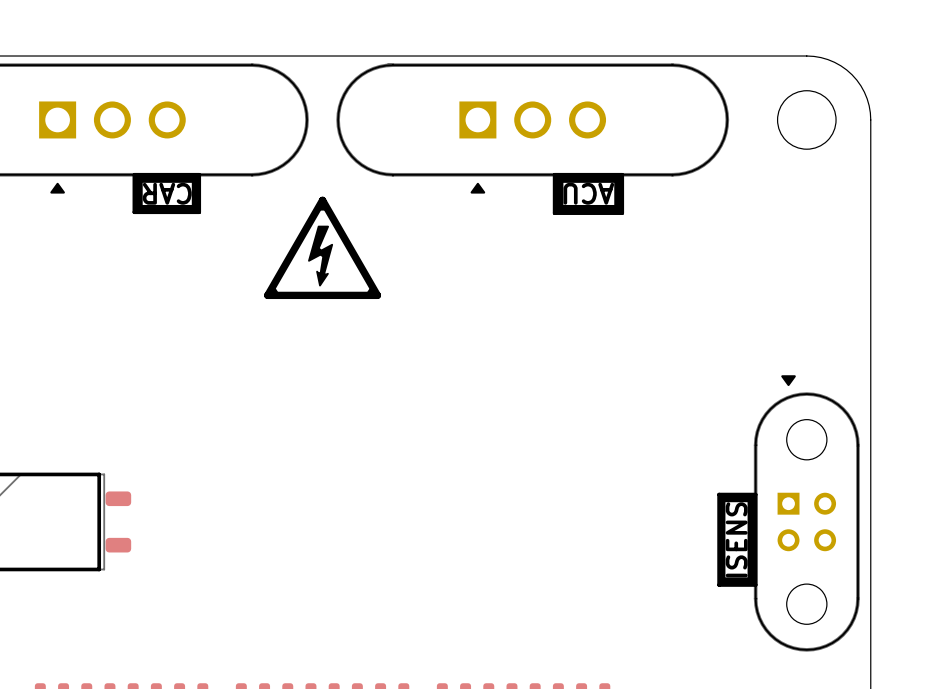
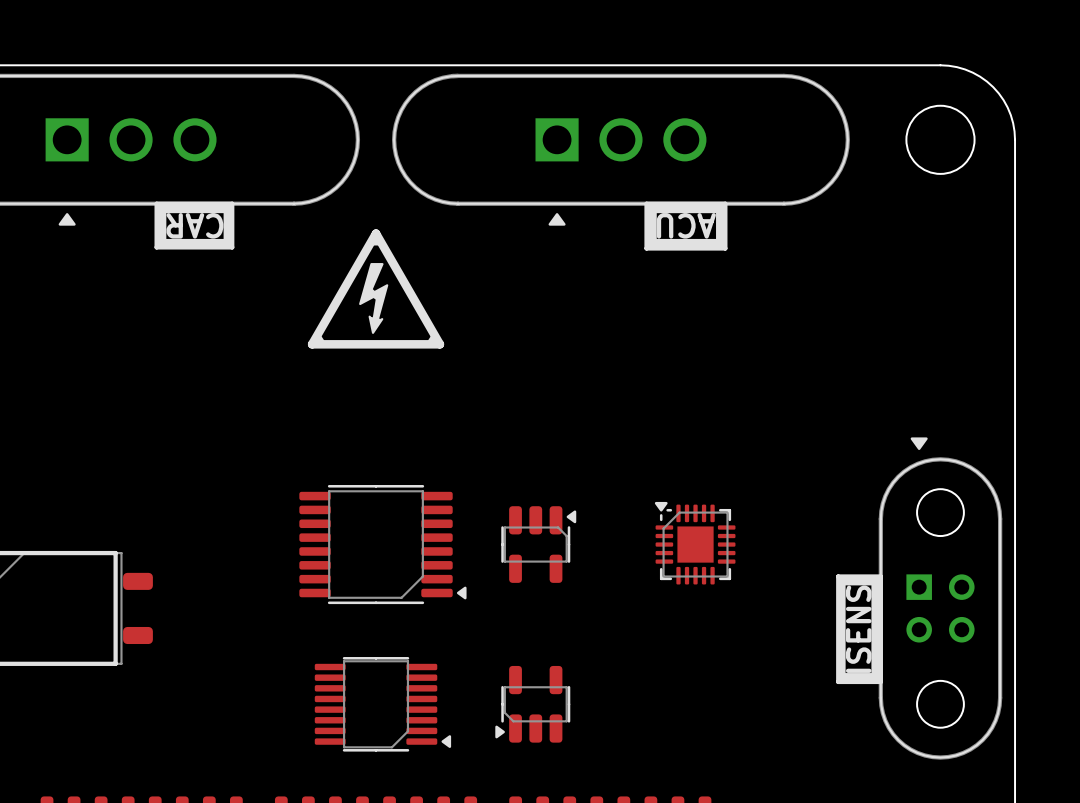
part: none -> (695, 543)
part: none -> (382, 544)
part: none -> (538, 544)
part: none -> (382, 704)
part: none -> (532, 704)

